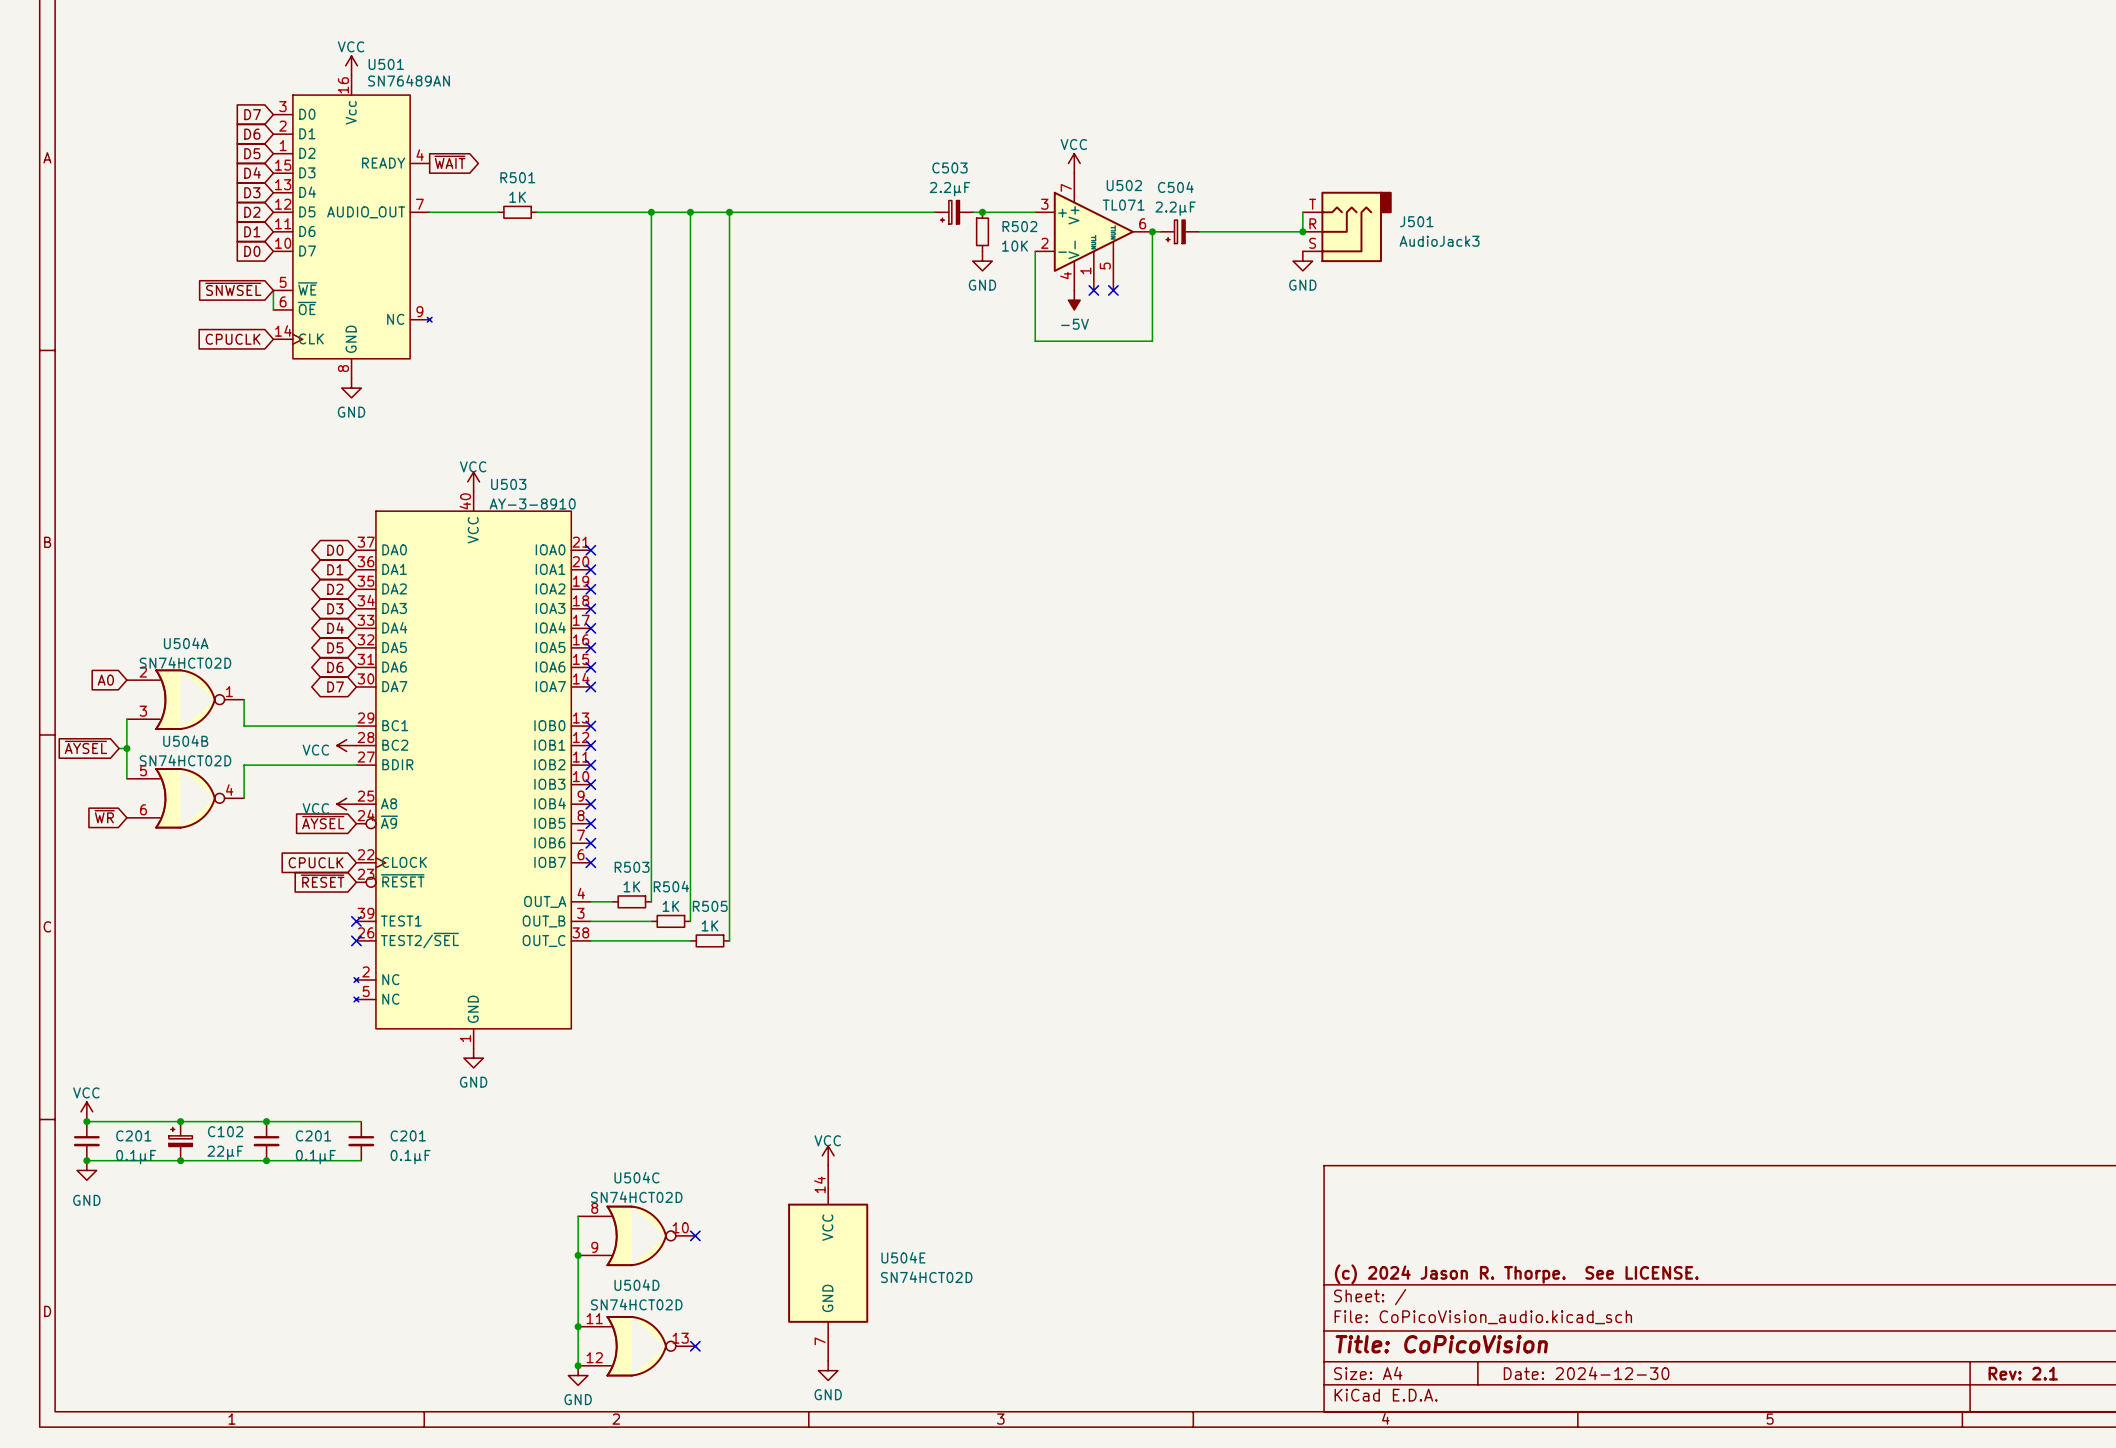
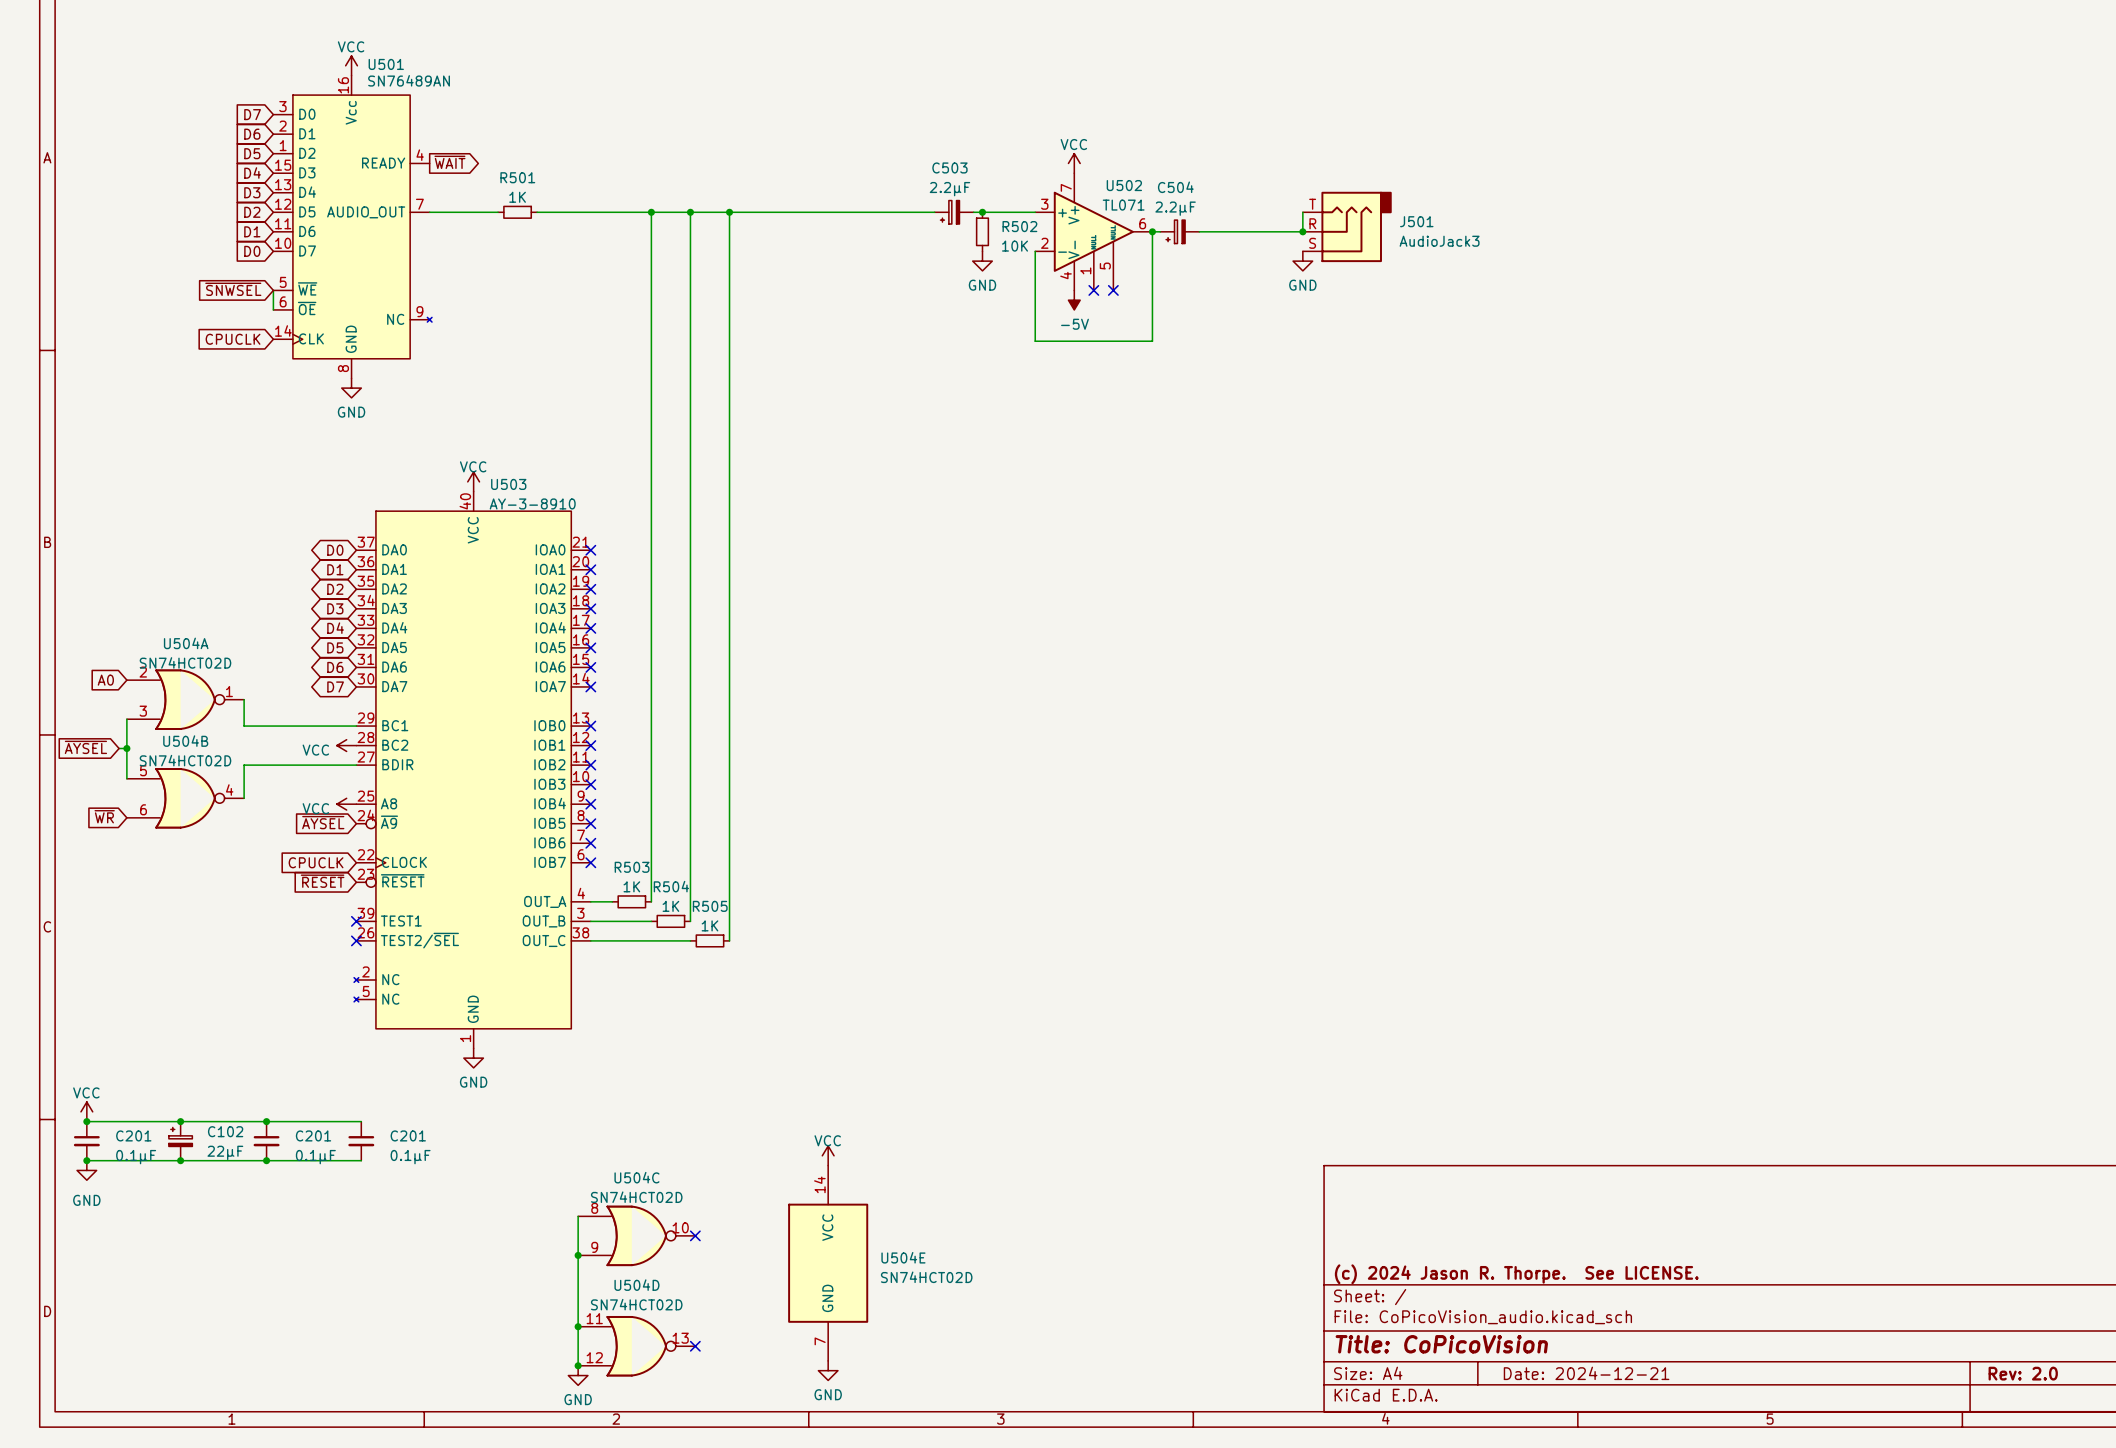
title block: Date: 2024-12-30 (1586, 1373) -> Date: 2024-12-21 (1586, 1373)
title block: Rev: 2.1 (2023, 1373) -> Rev: 2.0 (2023, 1373)

